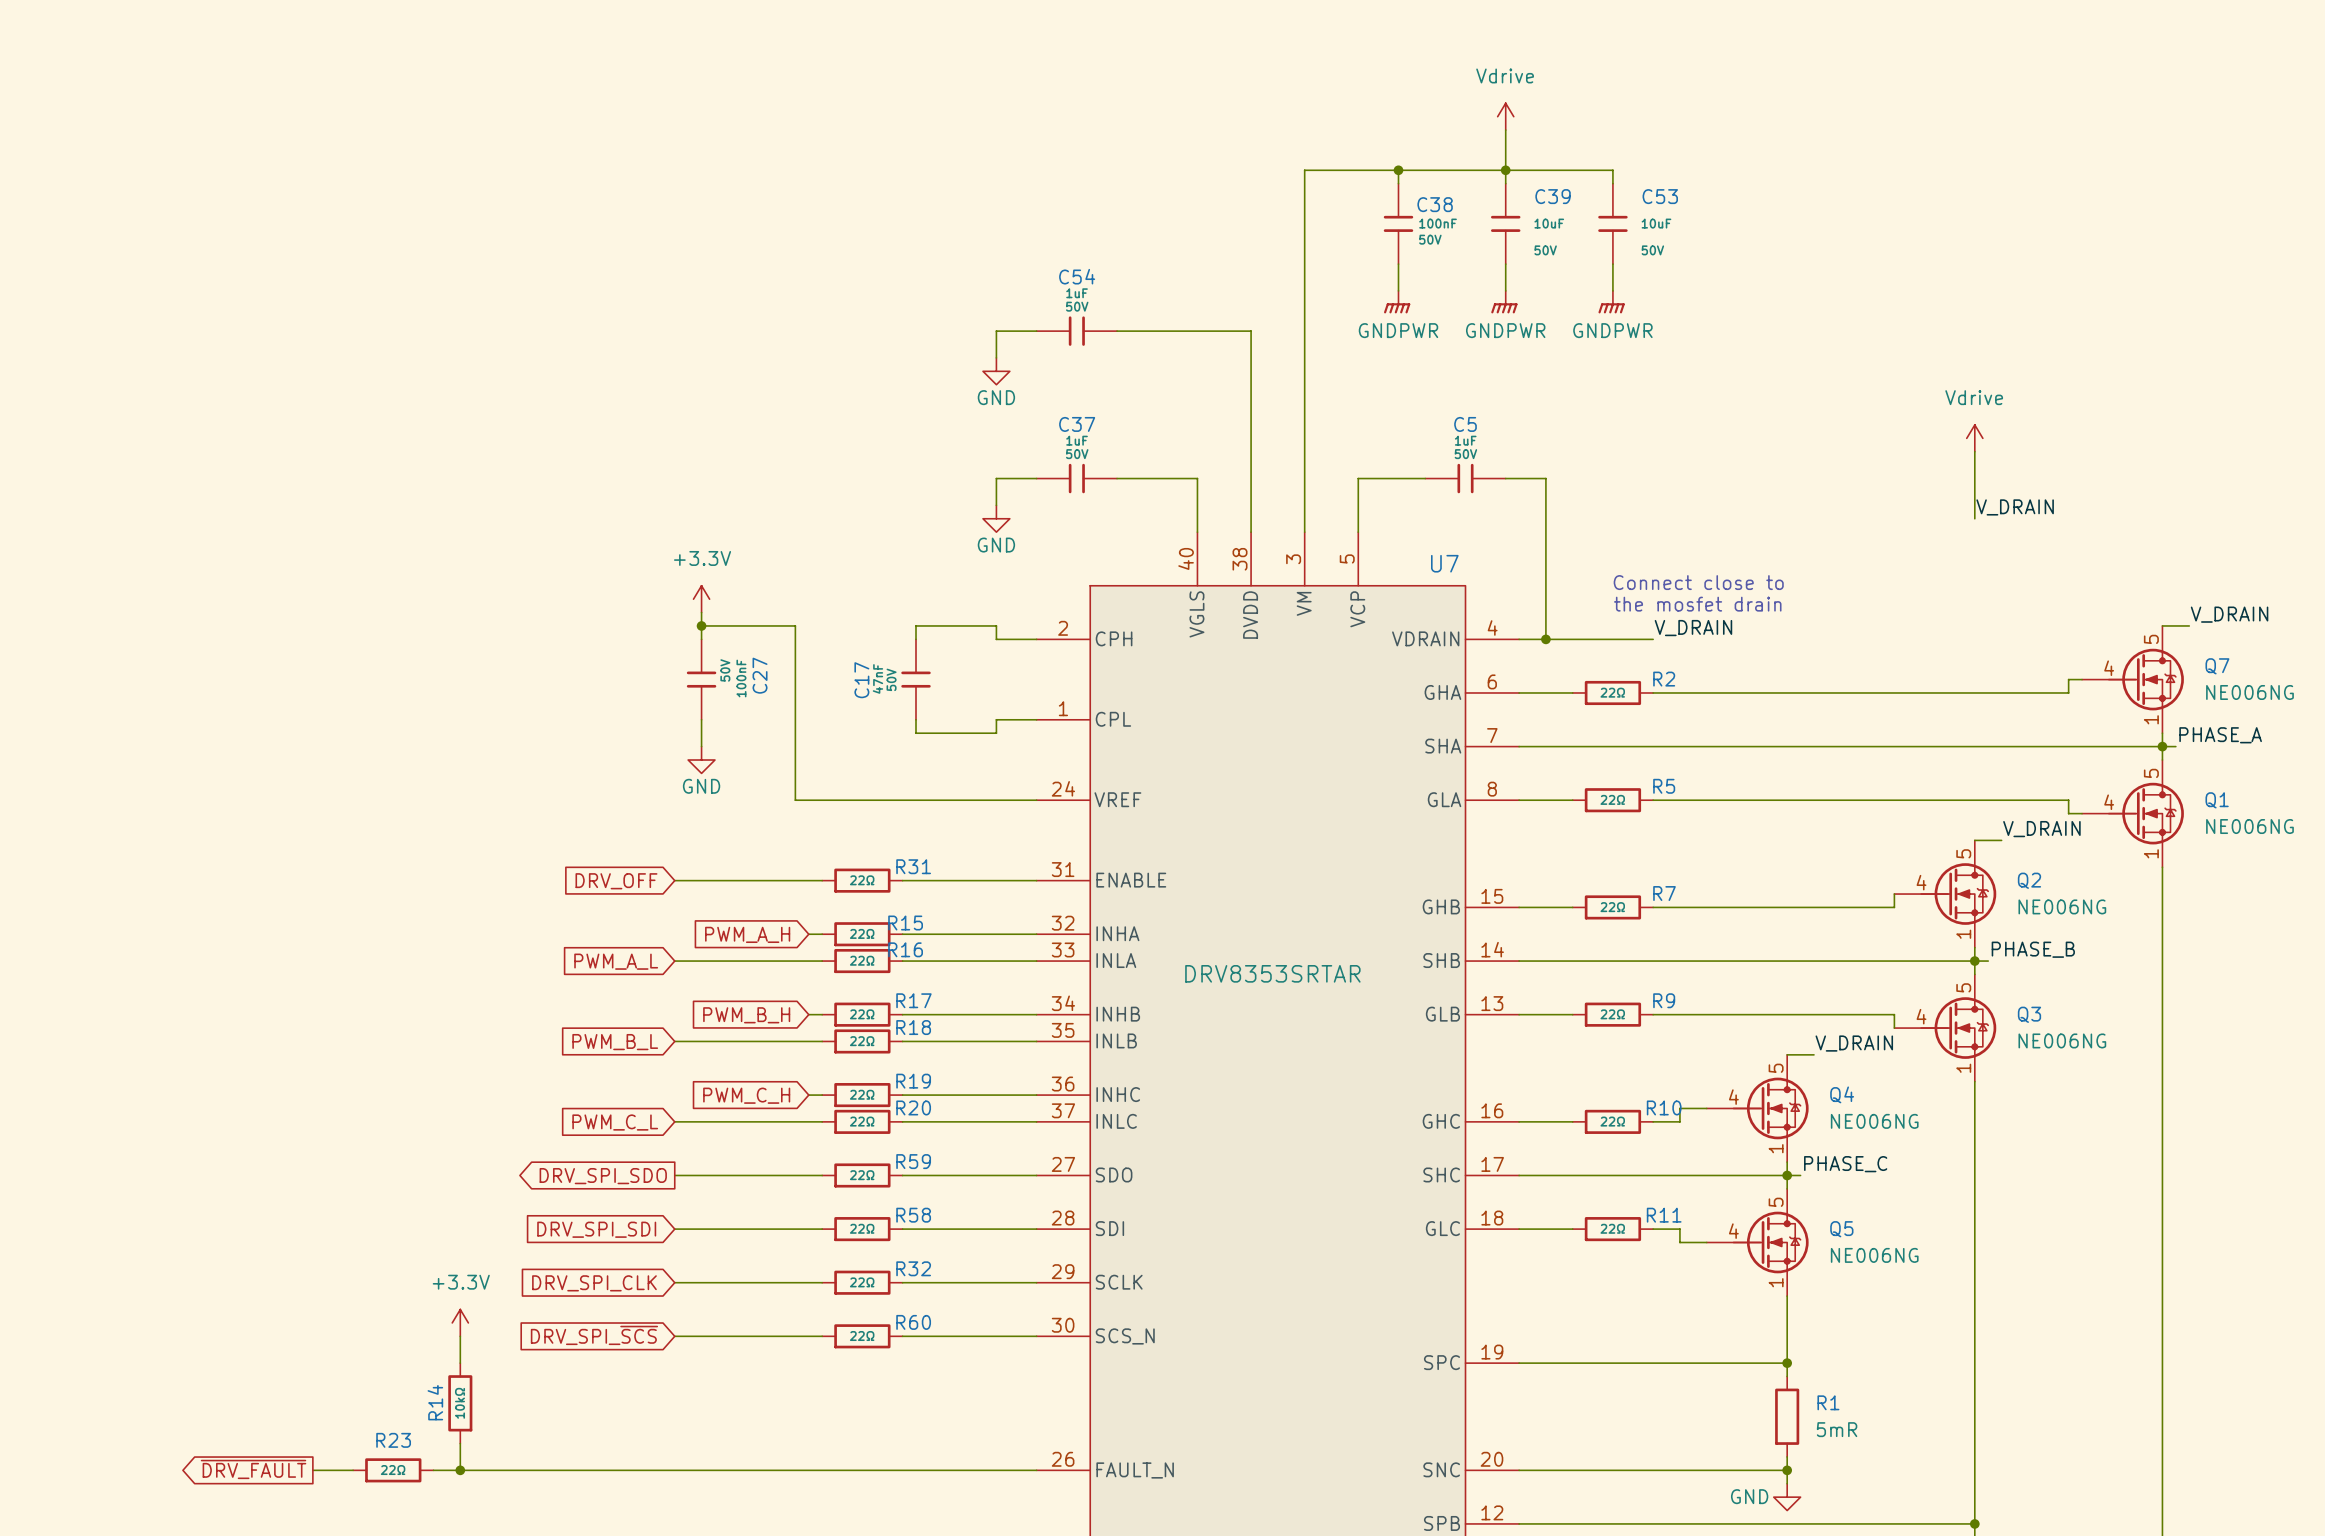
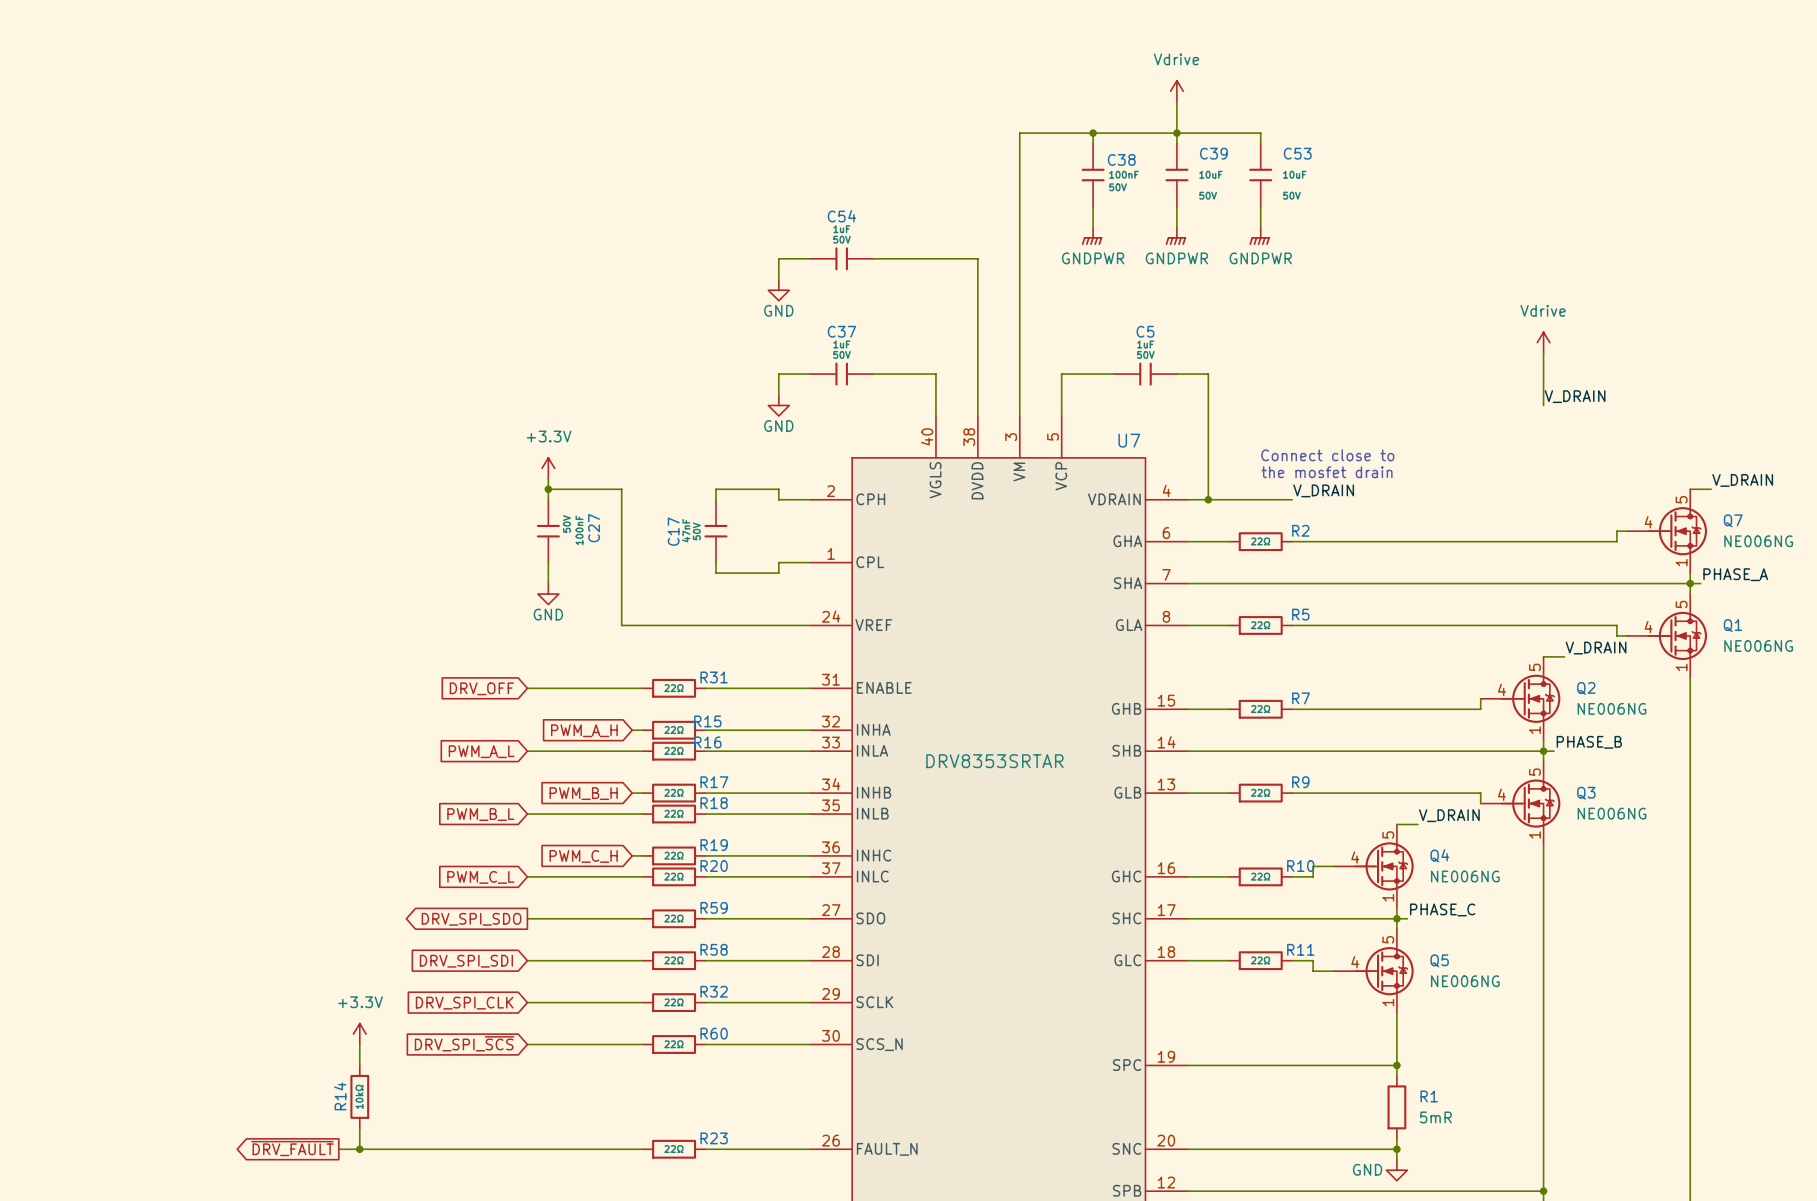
R23 name position: R23 (393, 1440) -> R23 (714, 1138)
global label position: ~{DRV_FAULT} (253, 1469) -> ~{DRV_FAULT} (292, 1148)
wire: (312, 1470) (353, 1470) -> none
R23 position: (393, 1470) -> (674, 1149)
wire: (822, 1470) (902, 1470) -> none

